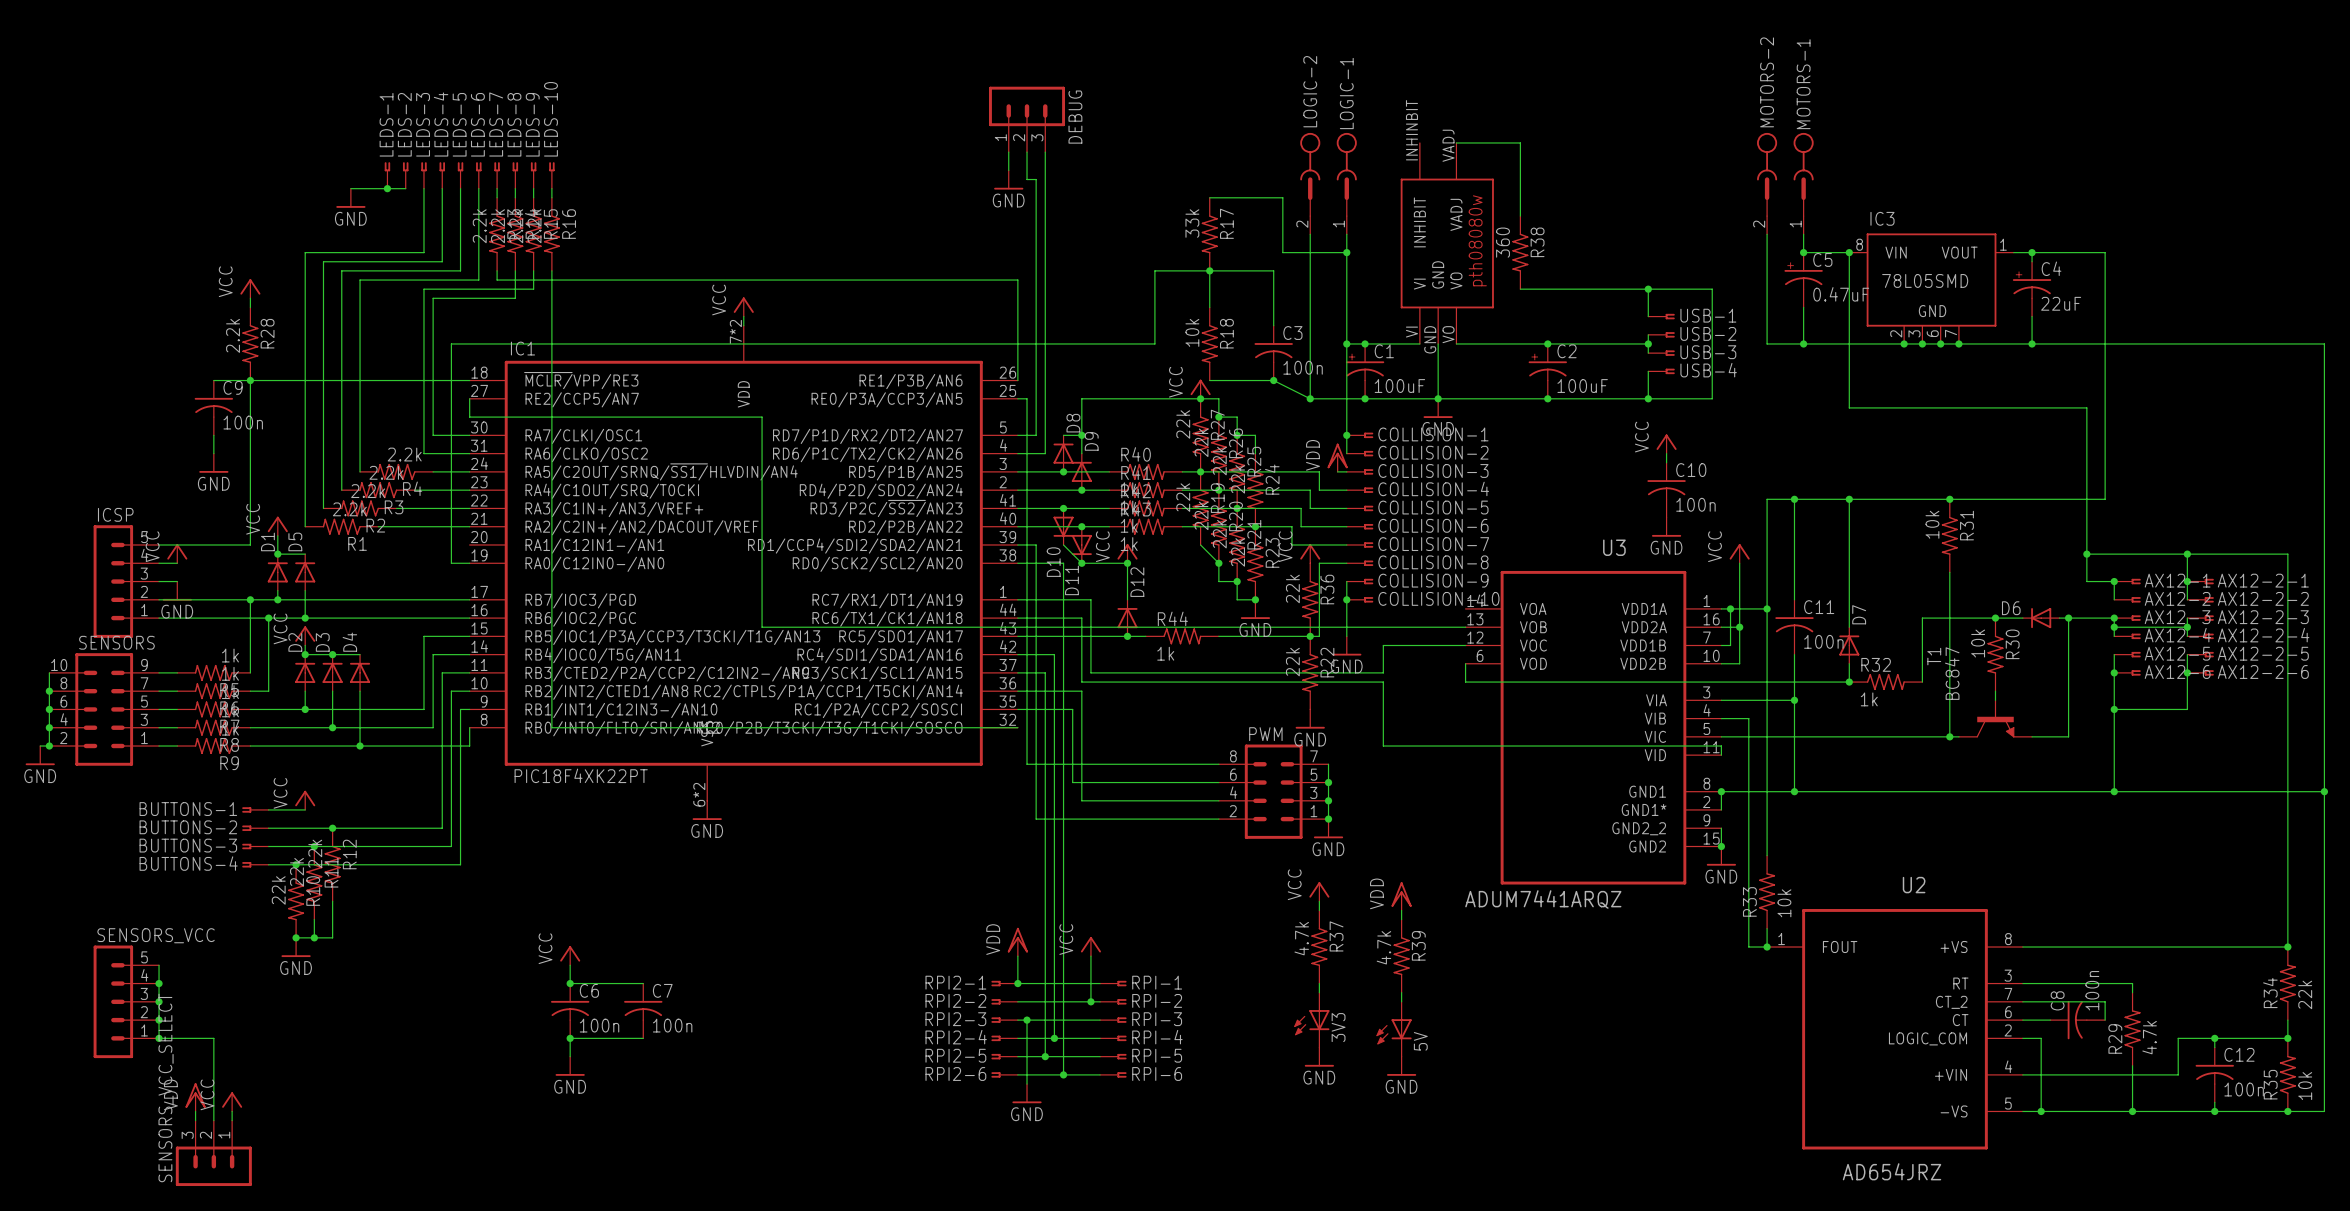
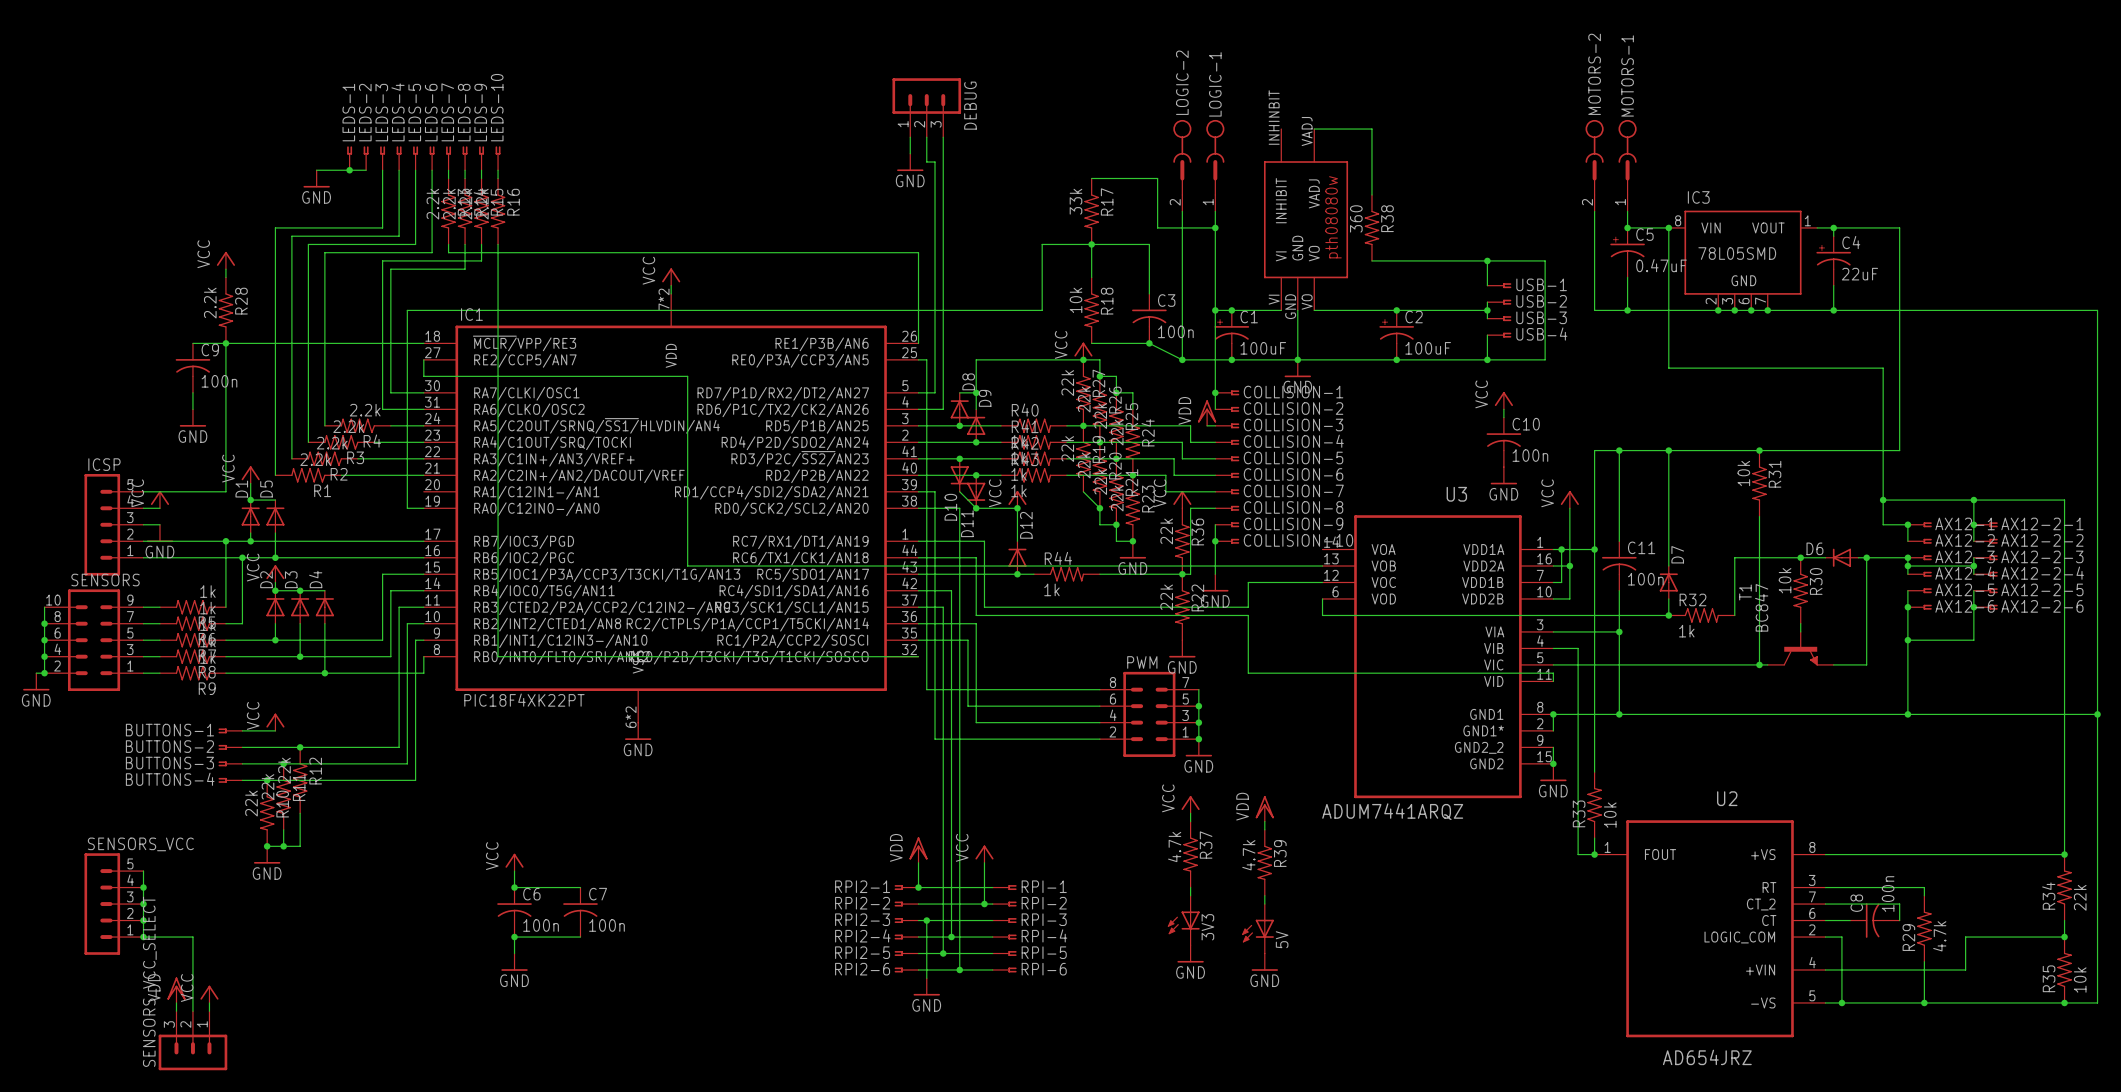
wire: (2214, 1038) (2214, 1047) -> none
junction: (2214, 1038) -> none
C12: 100n (2214, 1074) -> none
wire: (2214, 1102) (2214, 1111) -> none
junction: (2214, 1111) -> none

